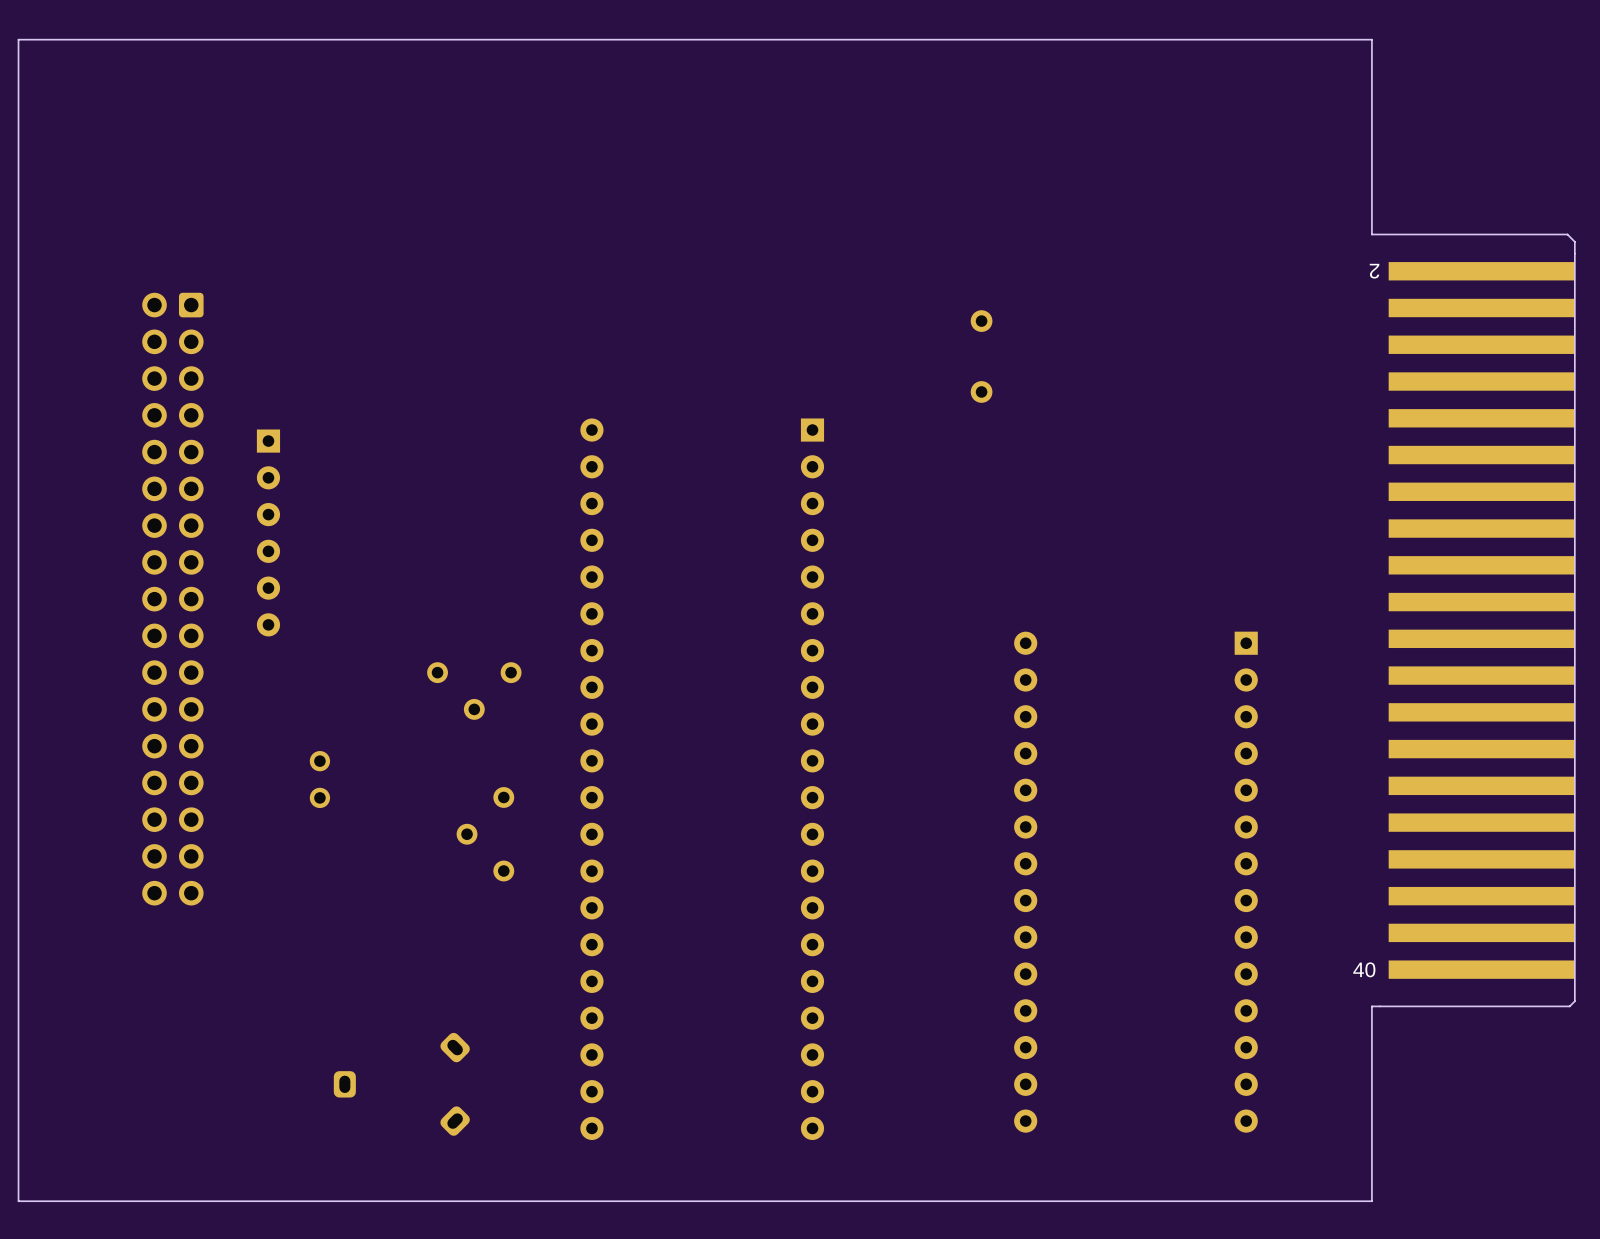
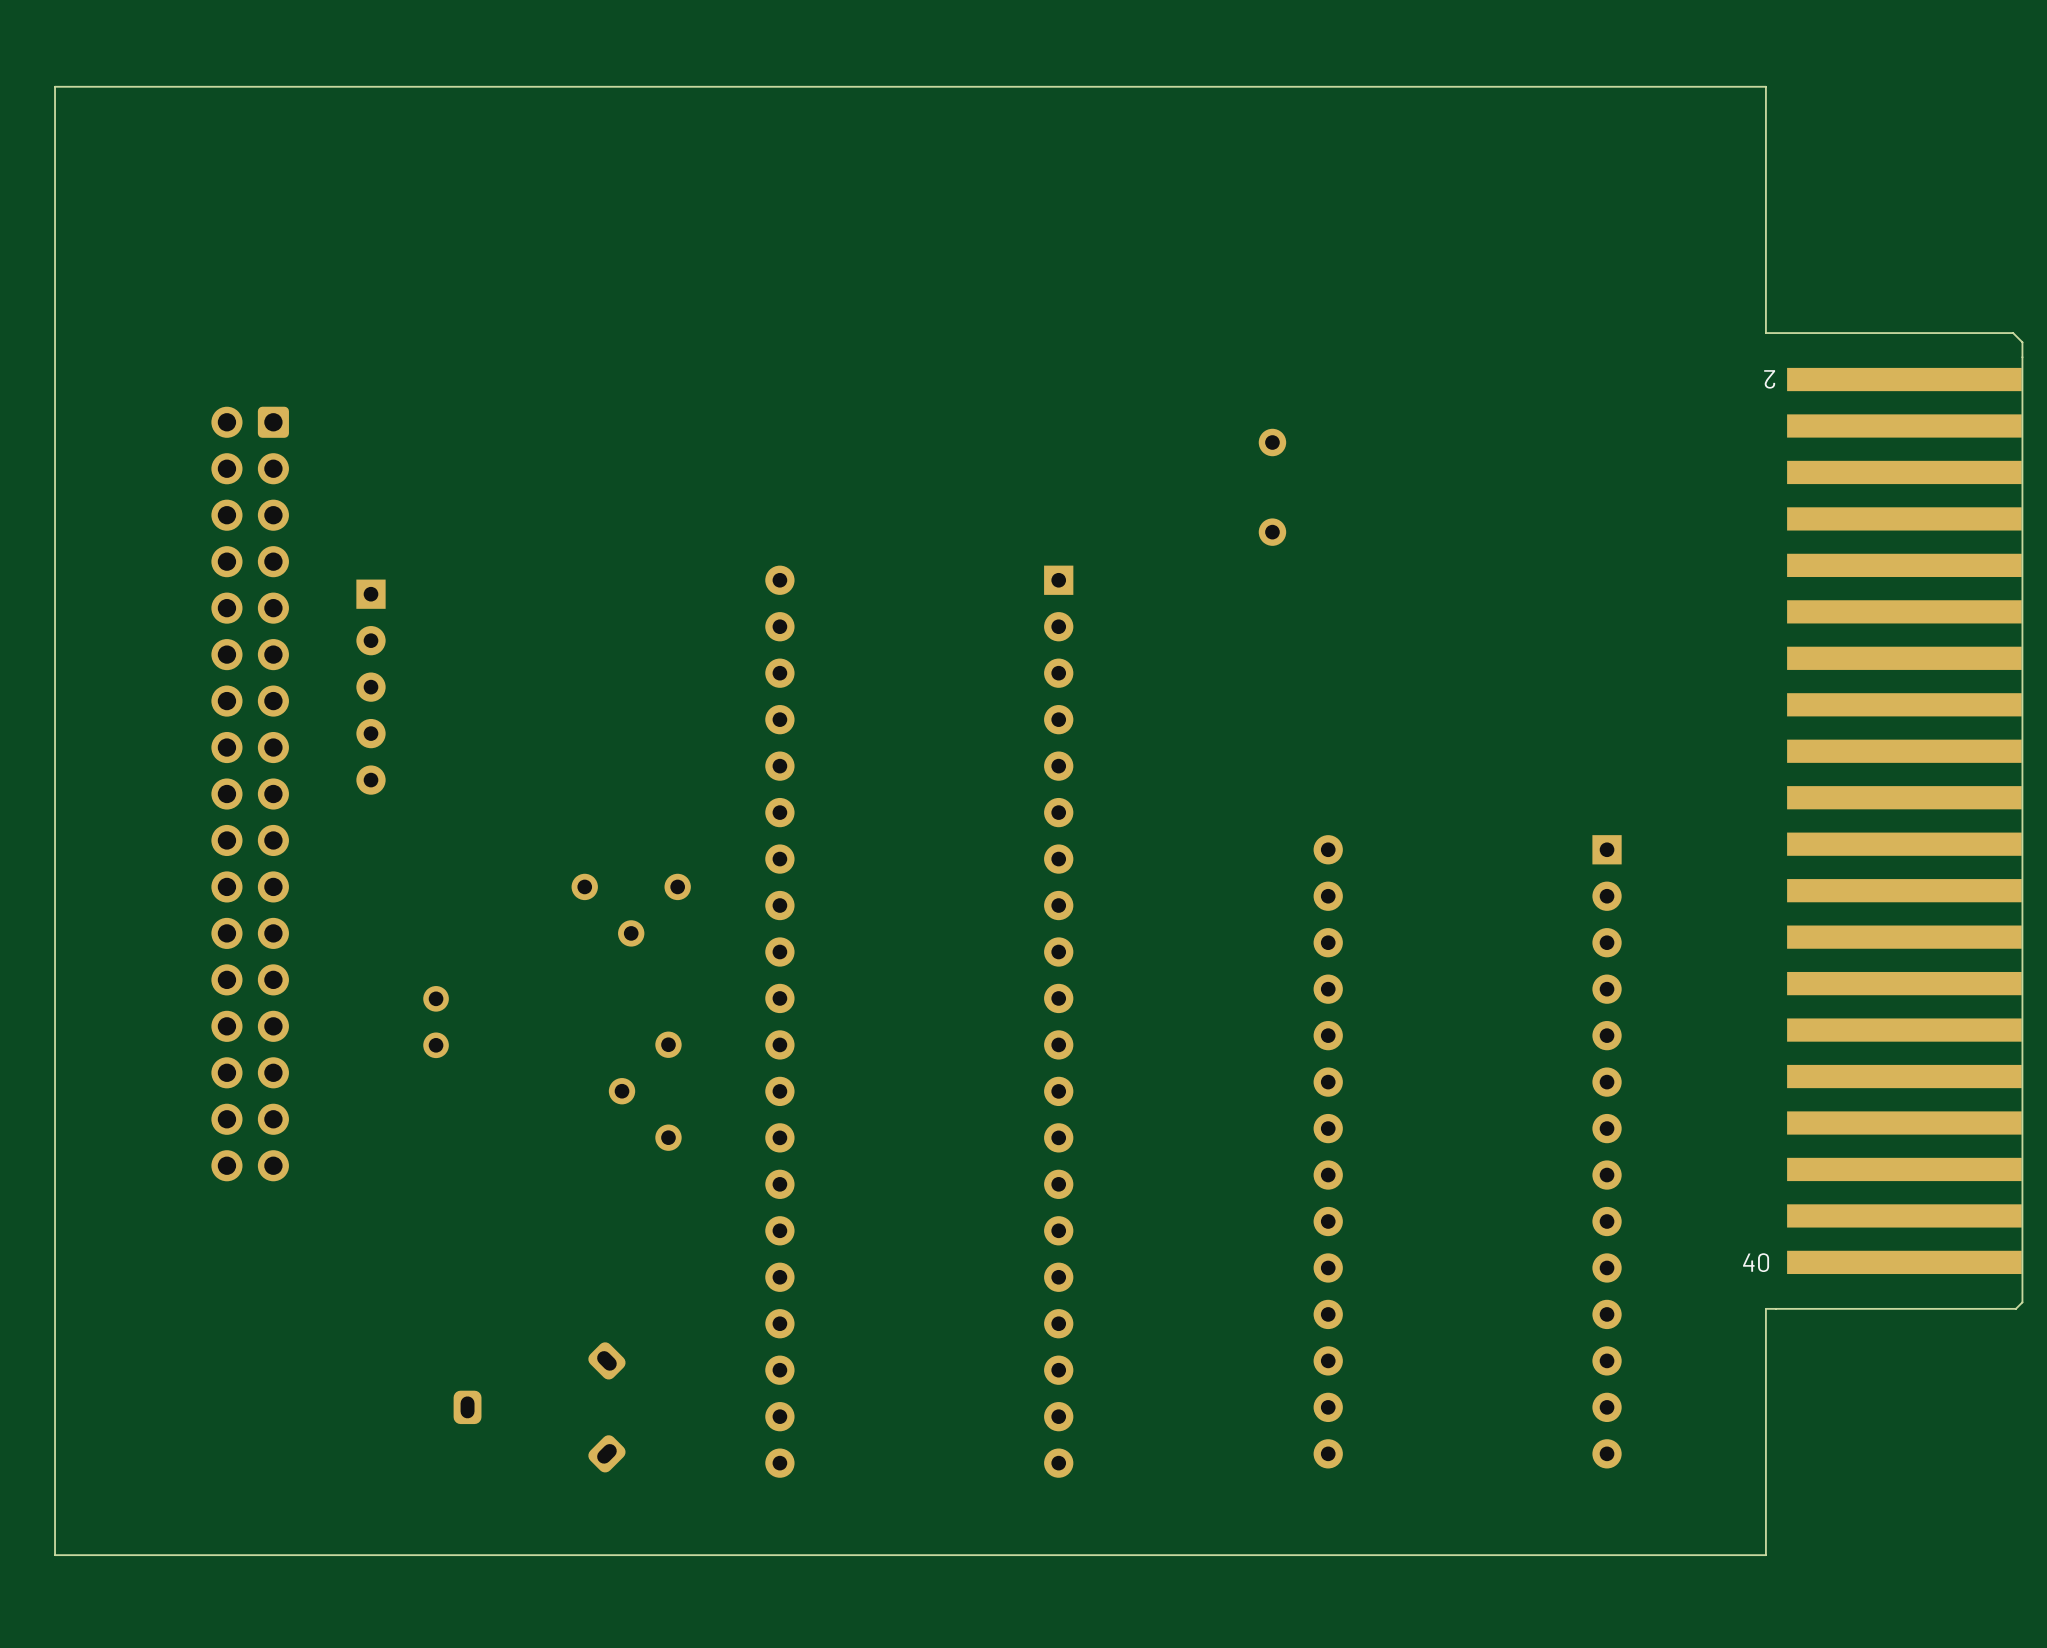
part: (268, 532) -> none

